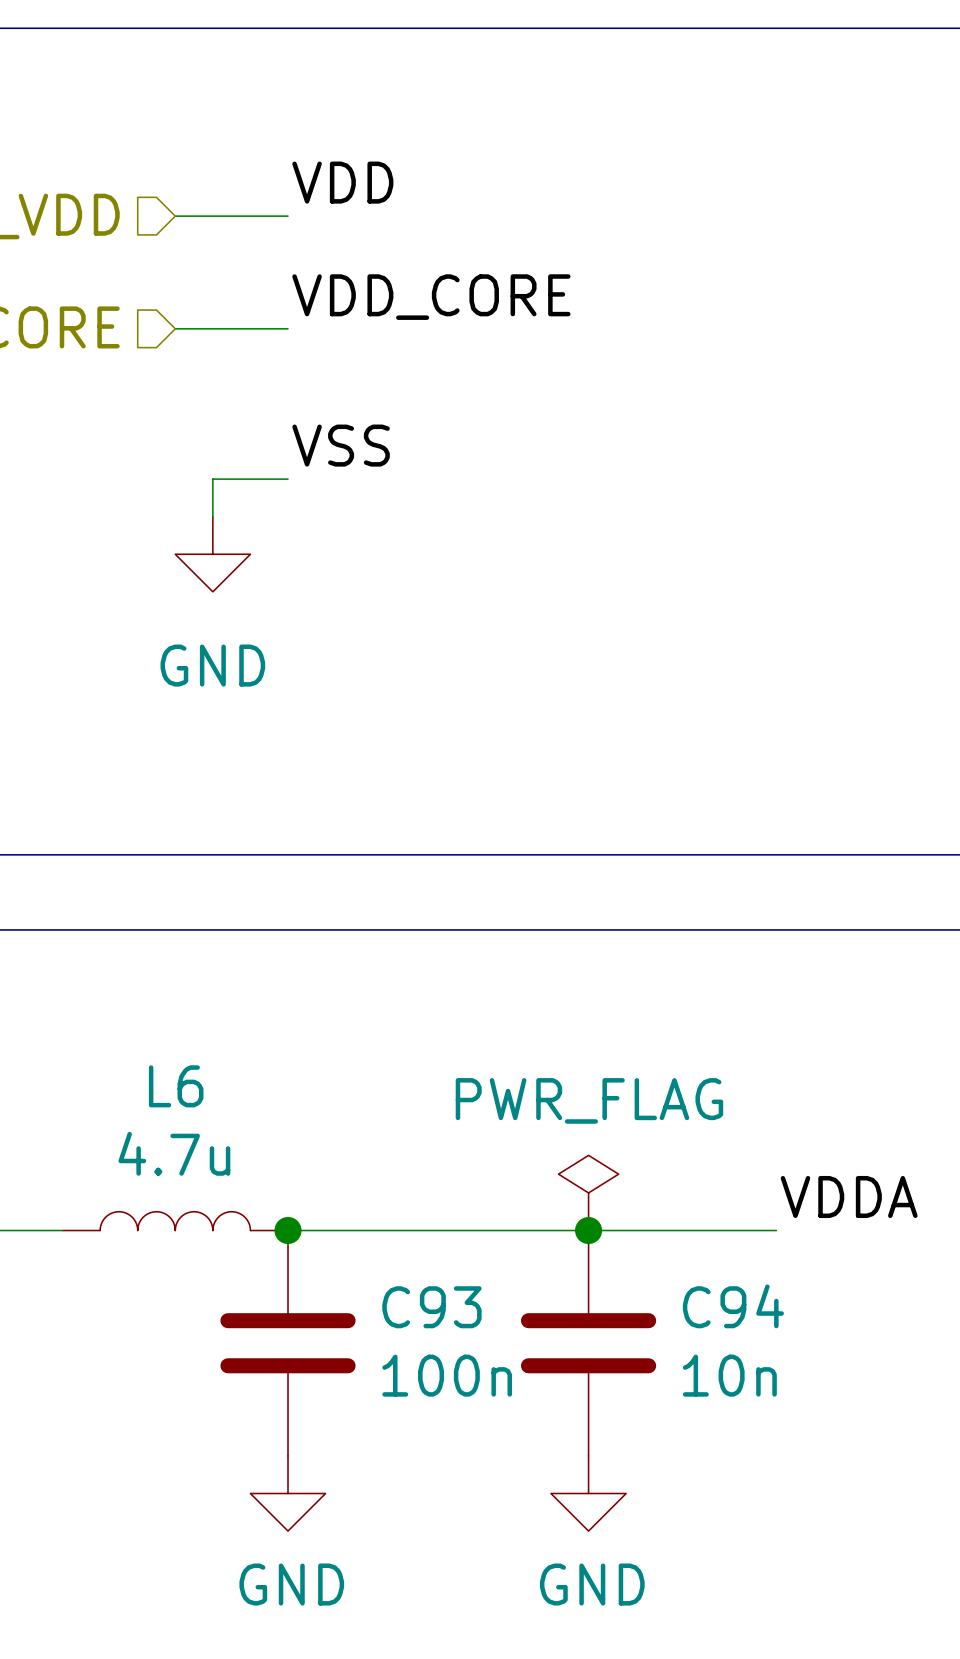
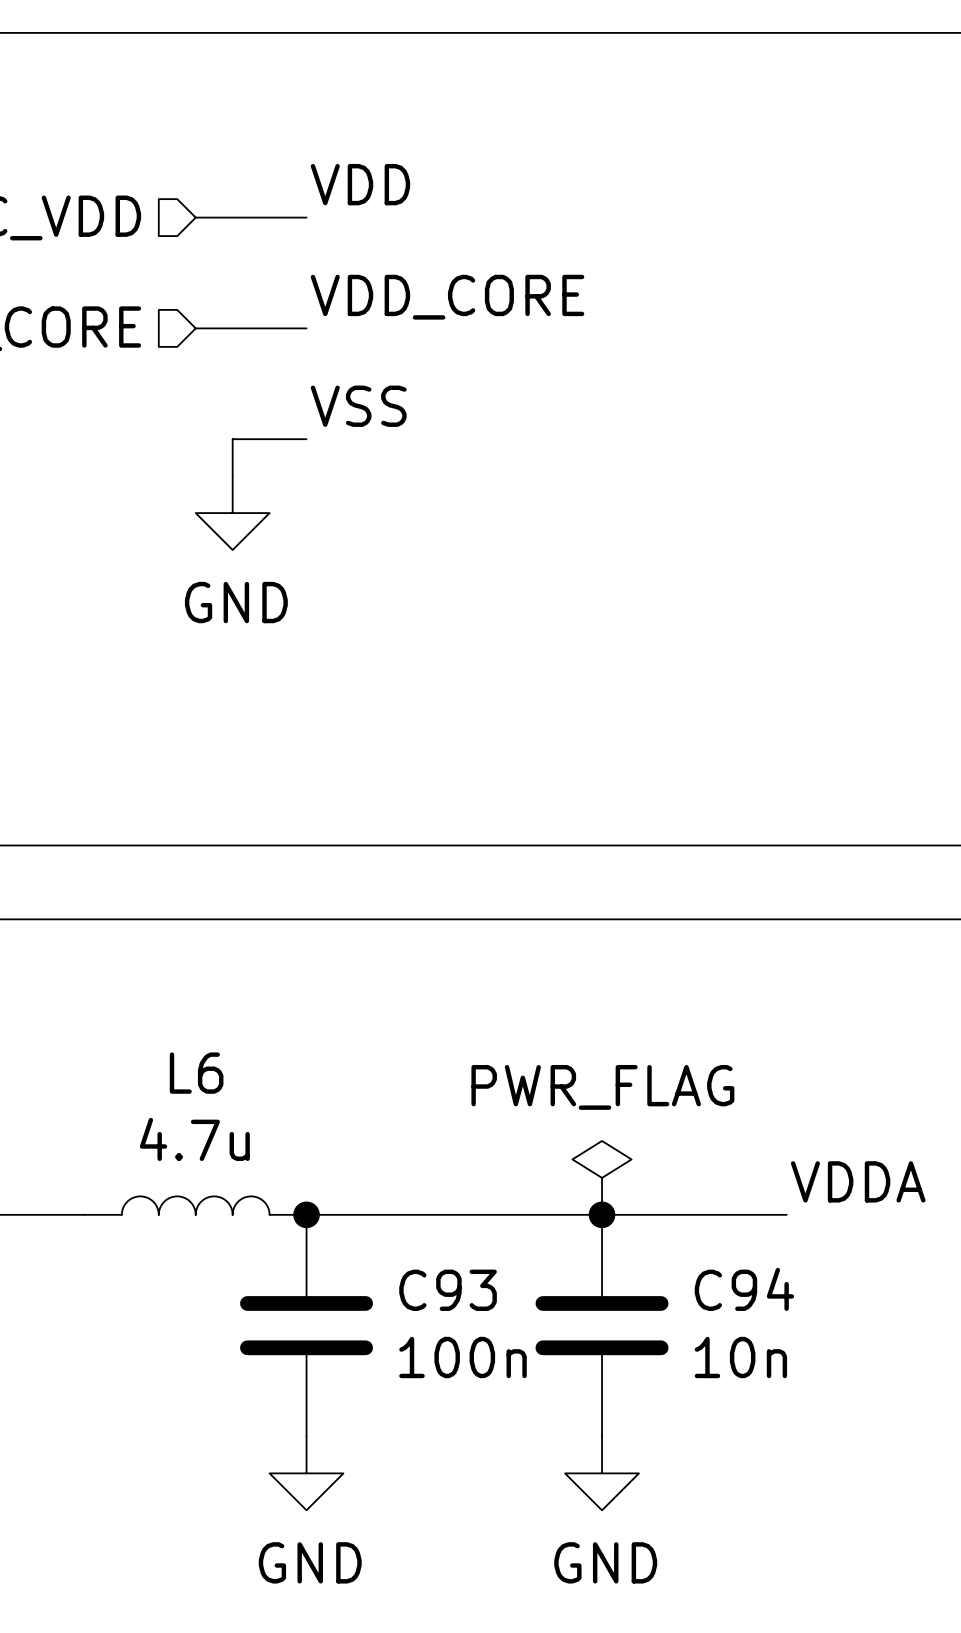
label position: VSS (341, 445) -> VSS (358, 406)
wire: (288, 479) (212, 479) (212, 516) -> (306, 439) (232, 439) (232, 476)
power symbol position: GND (212, 554) -> GND (232, 513)
power symbol text position: GND (212, 665) -> GND (236, 602)

